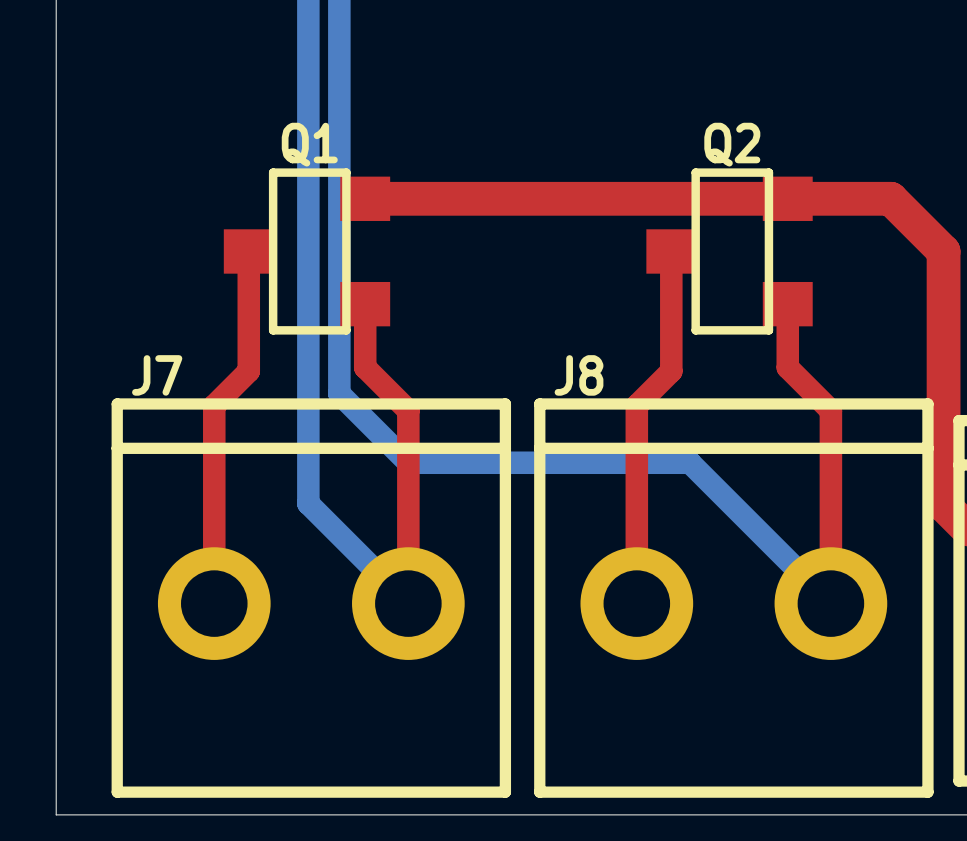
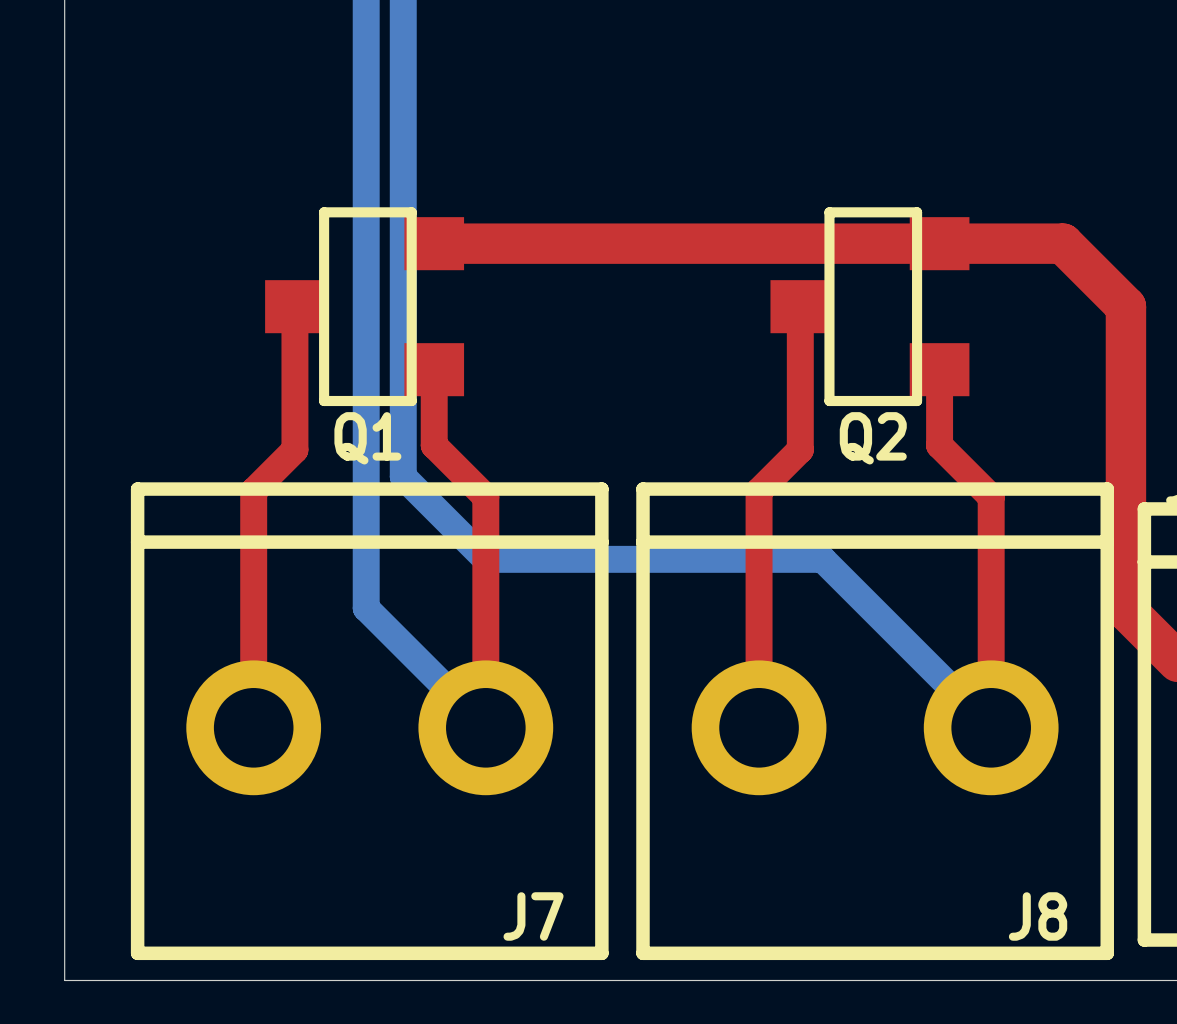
Q1 name position: Q1 (309, 144) -> Q1 (367, 438)
Q2 name position: Q2 (732, 144) -> Q2 (873, 438)
J7 name position: J7 (157, 375) -> J7 (533, 916)
J8 name position: J8 (579, 375) -> J8 (1038, 916)

